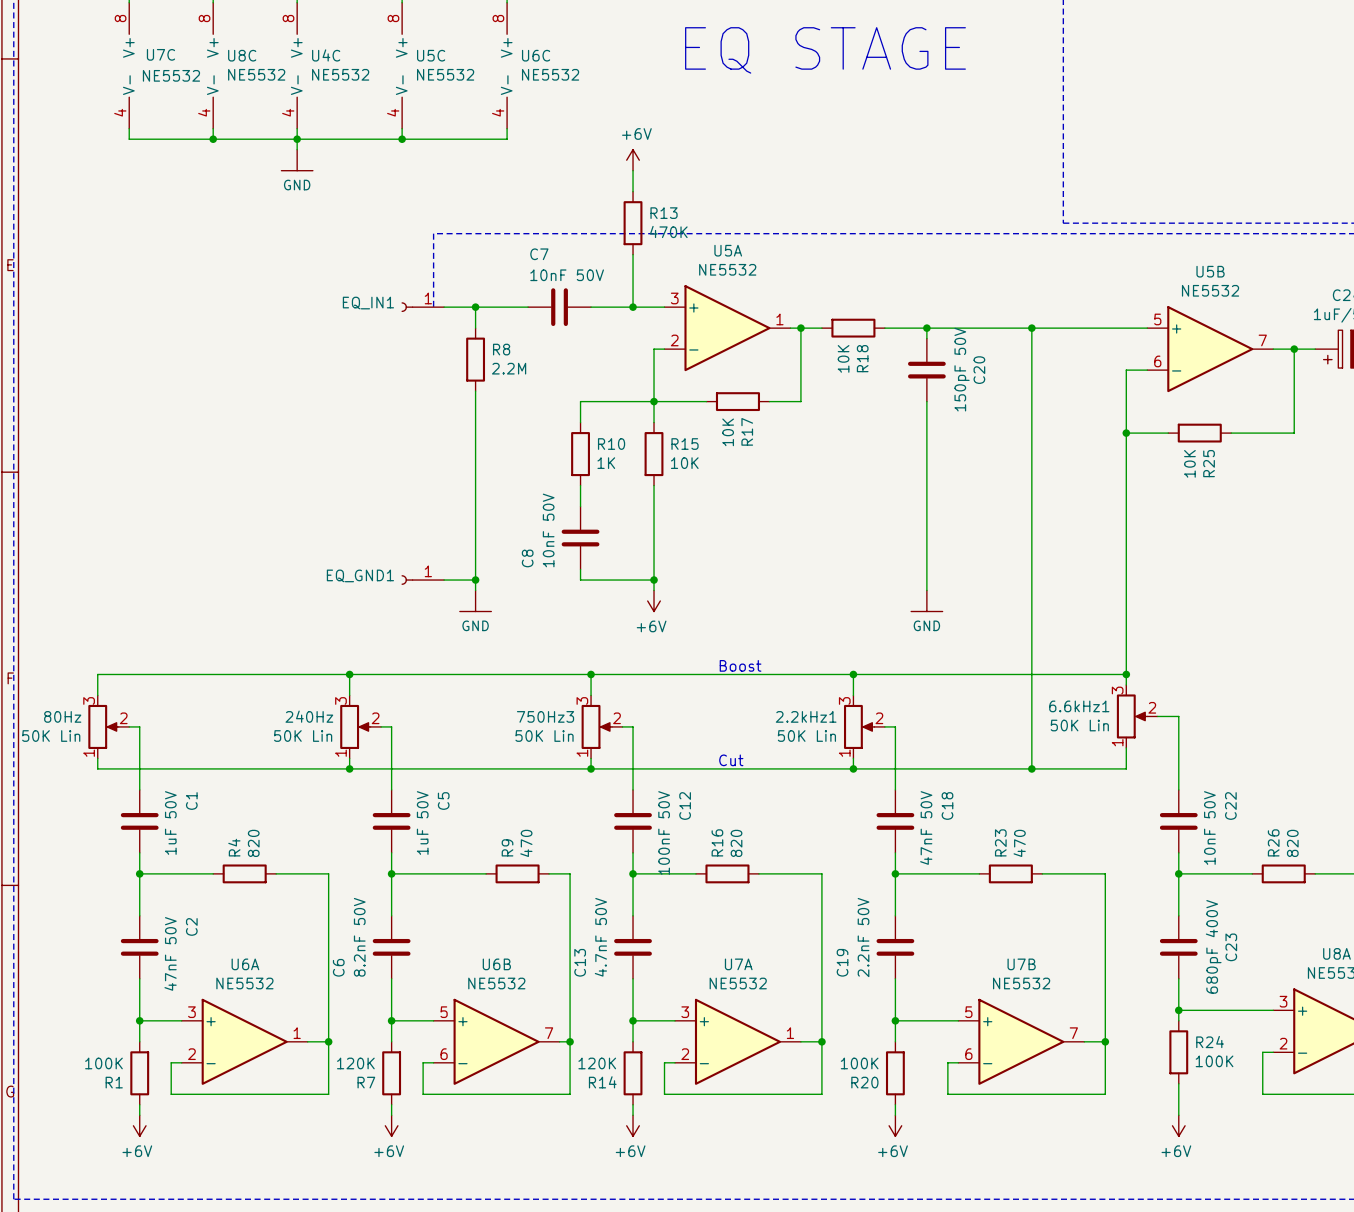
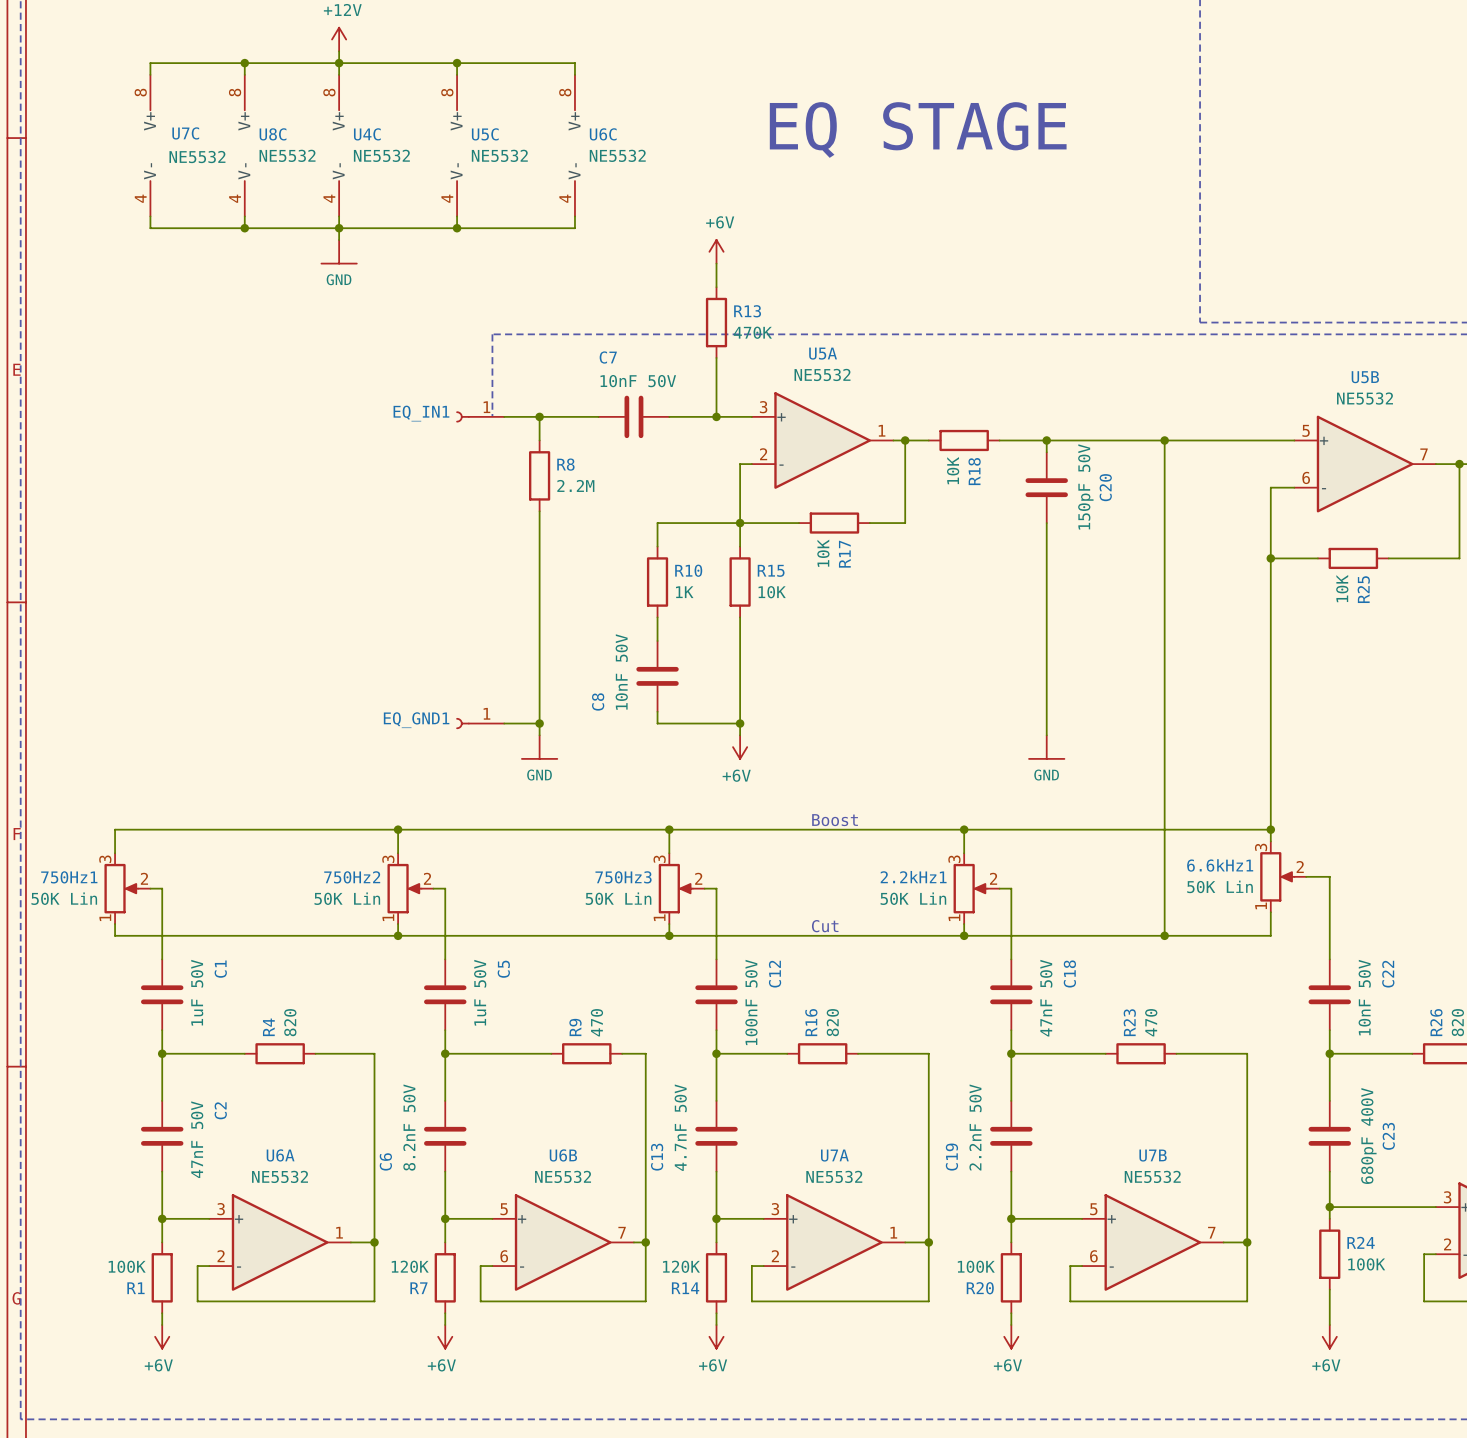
80Hz name: 80Hz (62, 716) -> 750Hz1 (69, 877)
240Hz name: 240Hz (309, 716) -> 750Hz2 (352, 877)

